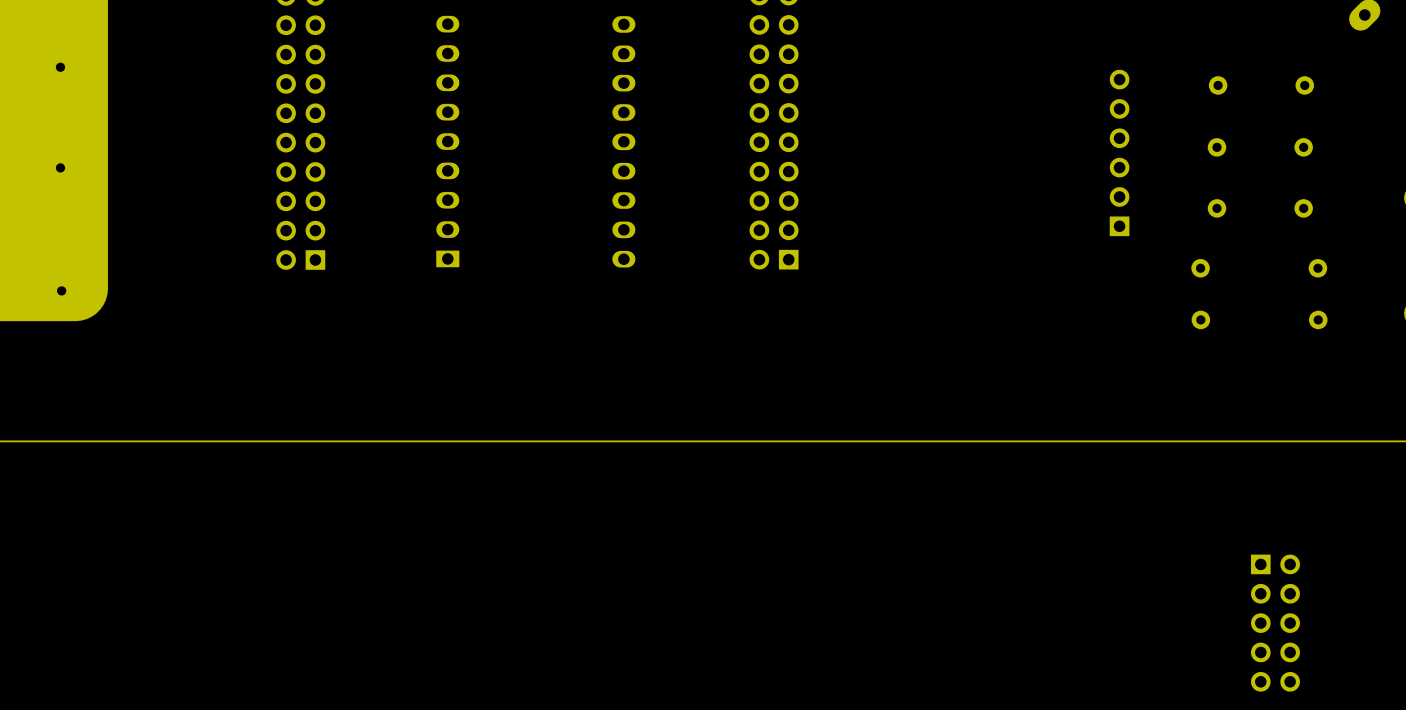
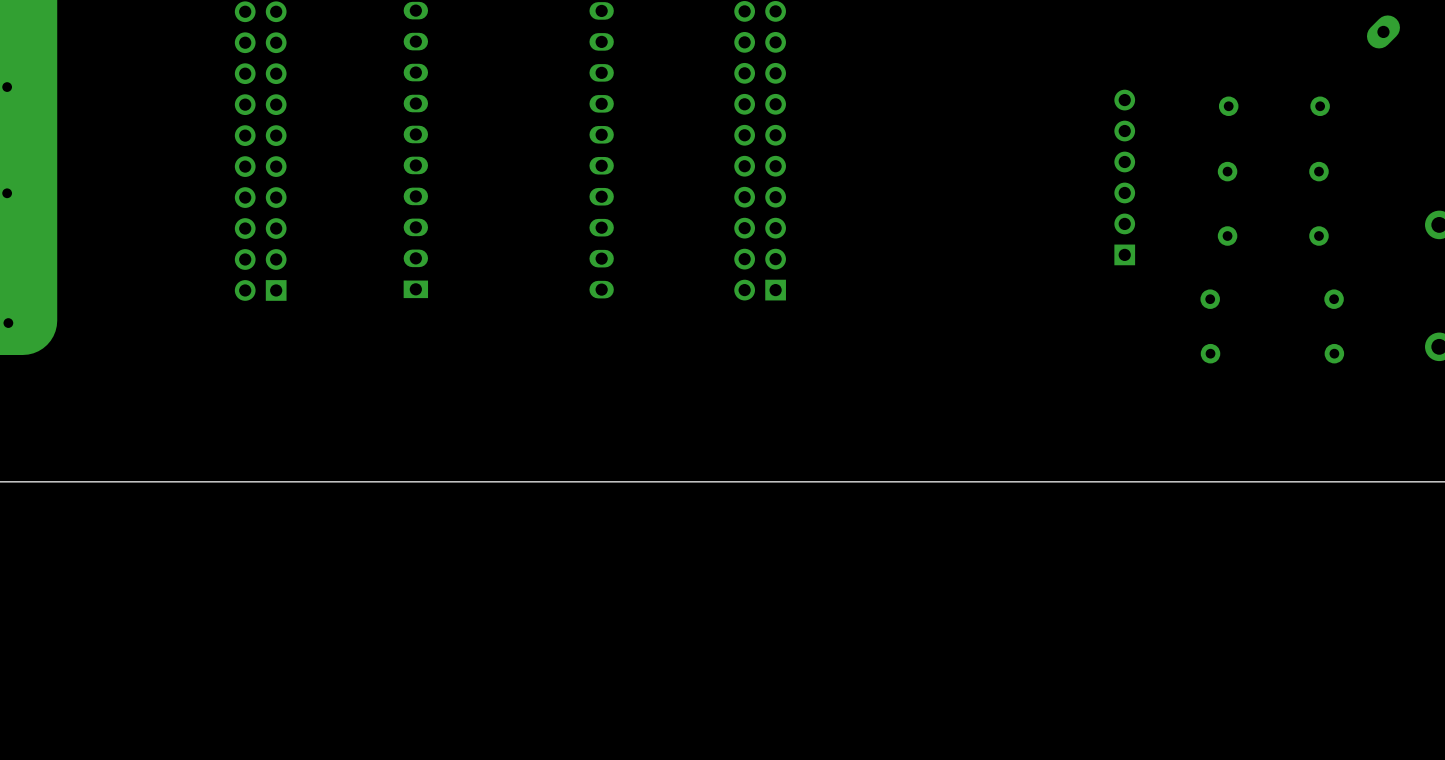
part: (1275, 623) -> none

